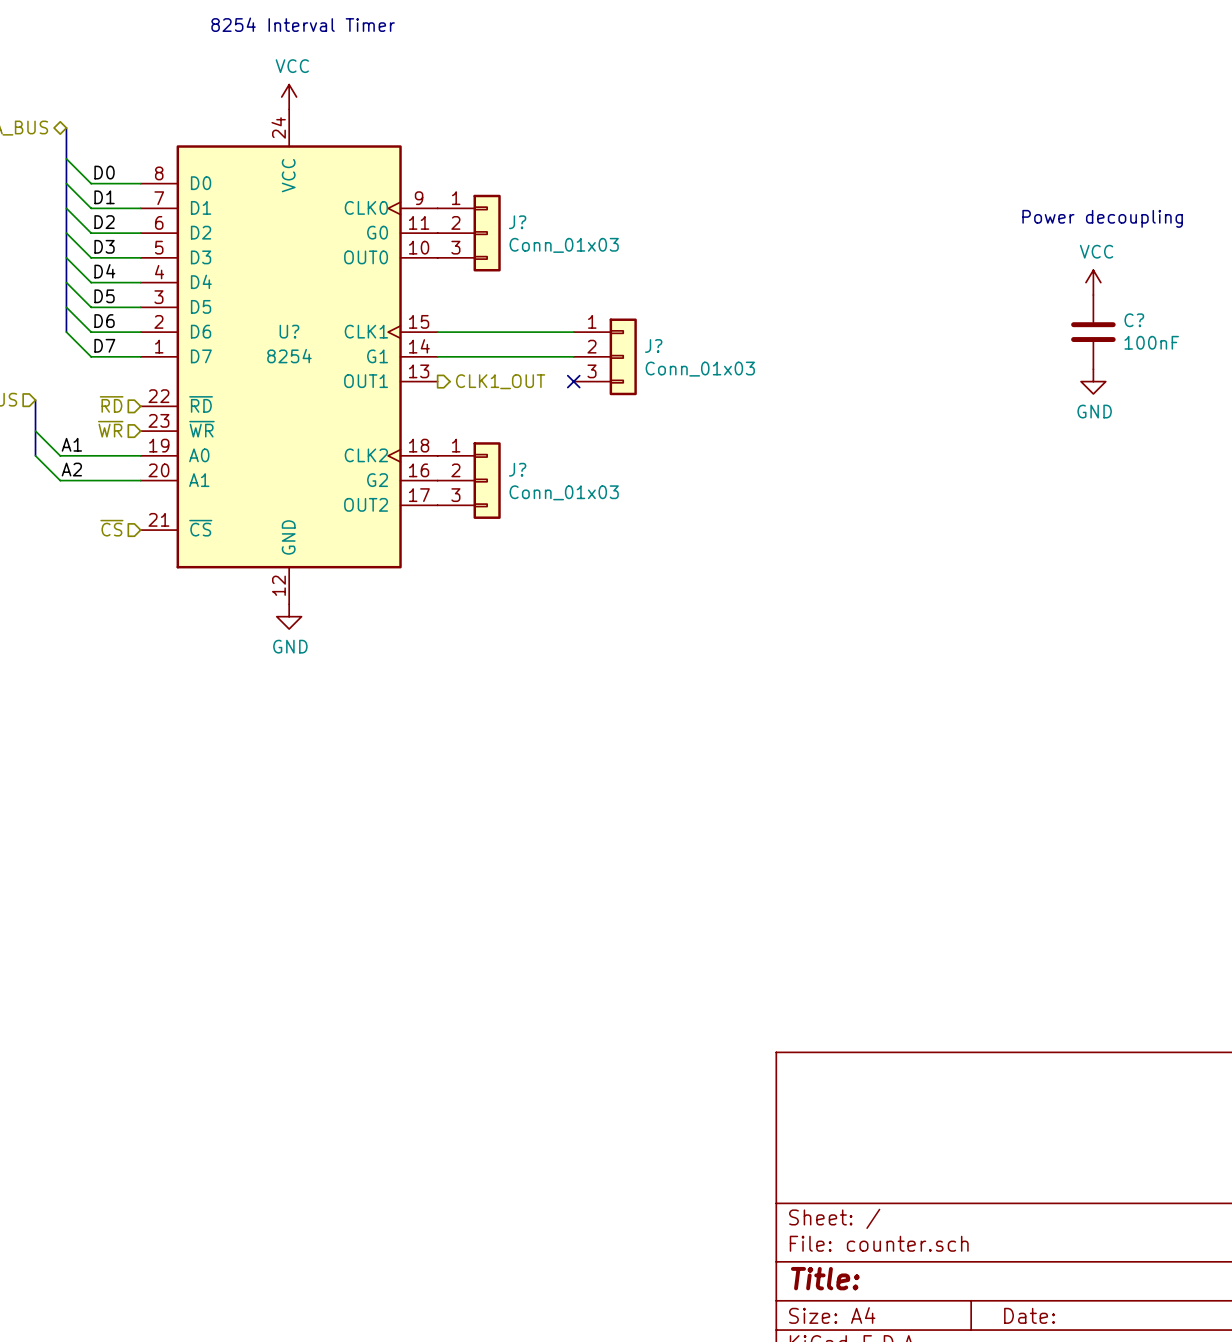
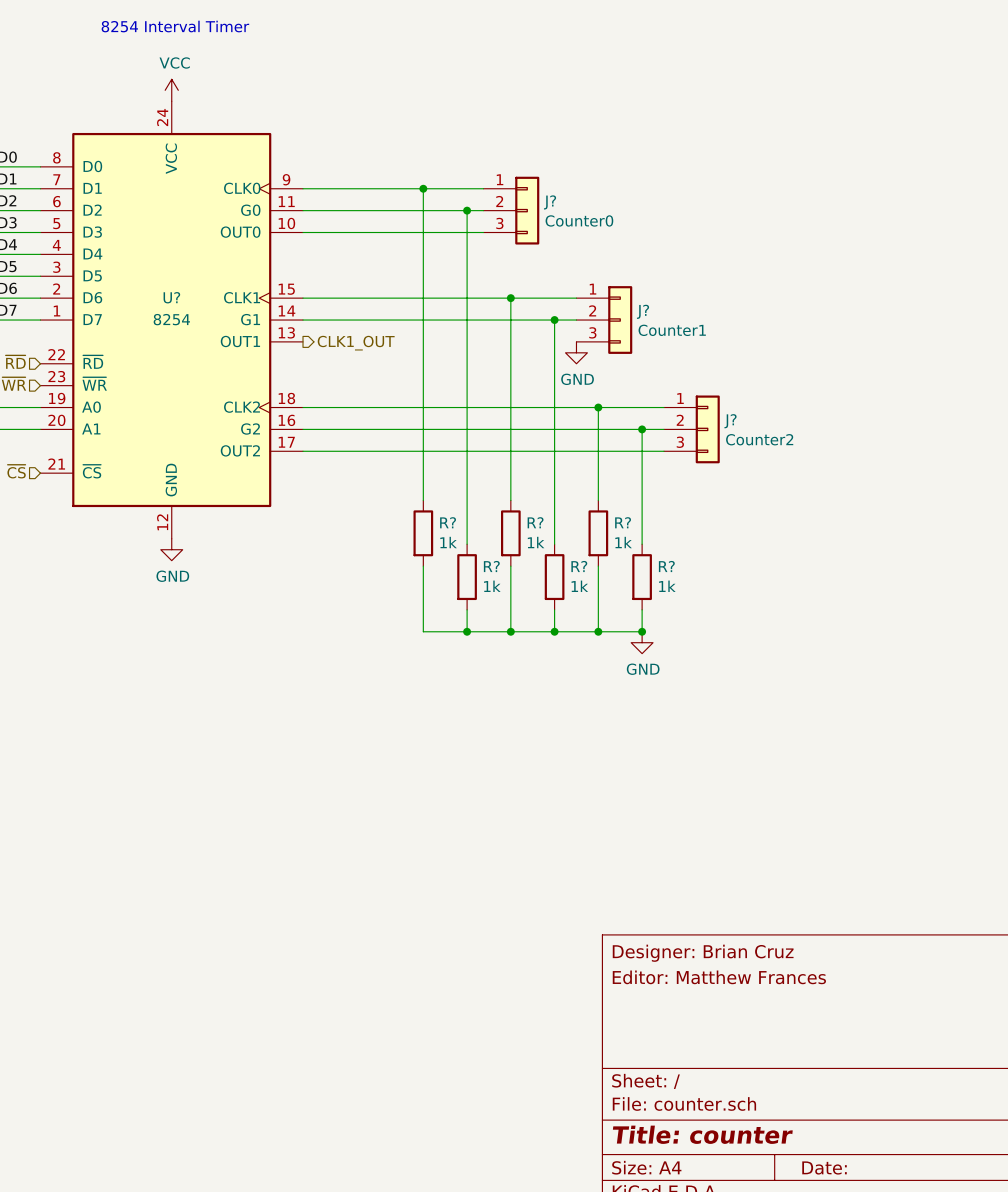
wire: none -> (303, 188) (483, 188)
wire: none -> (423, 188) (423, 500)
junction: none -> (423, 188)
text: Power decoupling (1102, 218) -> none
wire: none -> (303, 210) (483, 210)
J?: Conn_01x03 (469, 233) -> none
wire: none -> (467, 210) (467, 544)
junction: none -> (467, 210)
J?: none -> Counter0 (511, 210)
wire: none -> (303, 232) (483, 232)
power symbol: VCC (1093, 282) -> none
wire: none -> (423, 298) (576, 298)
wire: none -> (510, 298) (510, 500)
junction: none -> (510, 298)
C?: 100nF (1093, 332) -> none
wire: none -> (423, 320) (576, 320)
J?: Conn_01x03 (605, 356) -> none
wire: none -> (554, 320) (554, 544)
junction: none -> (554, 320)
J?: none -> Counter1 (604, 320)
no-connect mark: (573, 381) -> none
power symbol: GND (1093, 381) -> none
power symbol: none -> GND (576, 352)
wire: none -> (303, 407) (663, 407)
wire: none -> (598, 407) (598, 500)
junction: none -> (598, 407)
wire: none -> (303, 429) (663, 429)
J?: Conn_01x03 (469, 480) -> none
wire: none -> (642, 429) (642, 544)
junction: none -> (642, 429)
J?: none -> Counter2 (691, 429)
wire: none -> (303, 451) (663, 451)
R?: none -> 1k (423, 533)
R?: none -> 1k (510, 533)
R?: none -> 1k (598, 533)
wire: none -> (423, 566) (423, 631) (642, 631) (642, 609)
wire: none -> (510, 566) (510, 631)
wire: none -> (598, 566) (598, 631)
R?: none -> 1k (467, 577)
R?: none -> 1k (554, 577)
R?: none -> 1k (642, 577)
wire: none -> (467, 609) (467, 631)
wire: none -> (554, 609) (554, 631)
junction: none -> (467, 631)
junction: none -> (510, 631)
junction: none -> (554, 631)
junction: none -> (598, 631)
junction: none -> (642, 631)
power symbol: none -> GND (642, 642)
title block: none -> Designer: Brian Cruz (703, 953)
title block: none -> Editor: Matthew Frances (719, 977)
title block: Title: (825, 1278) -> Title: counter (702, 1134)

